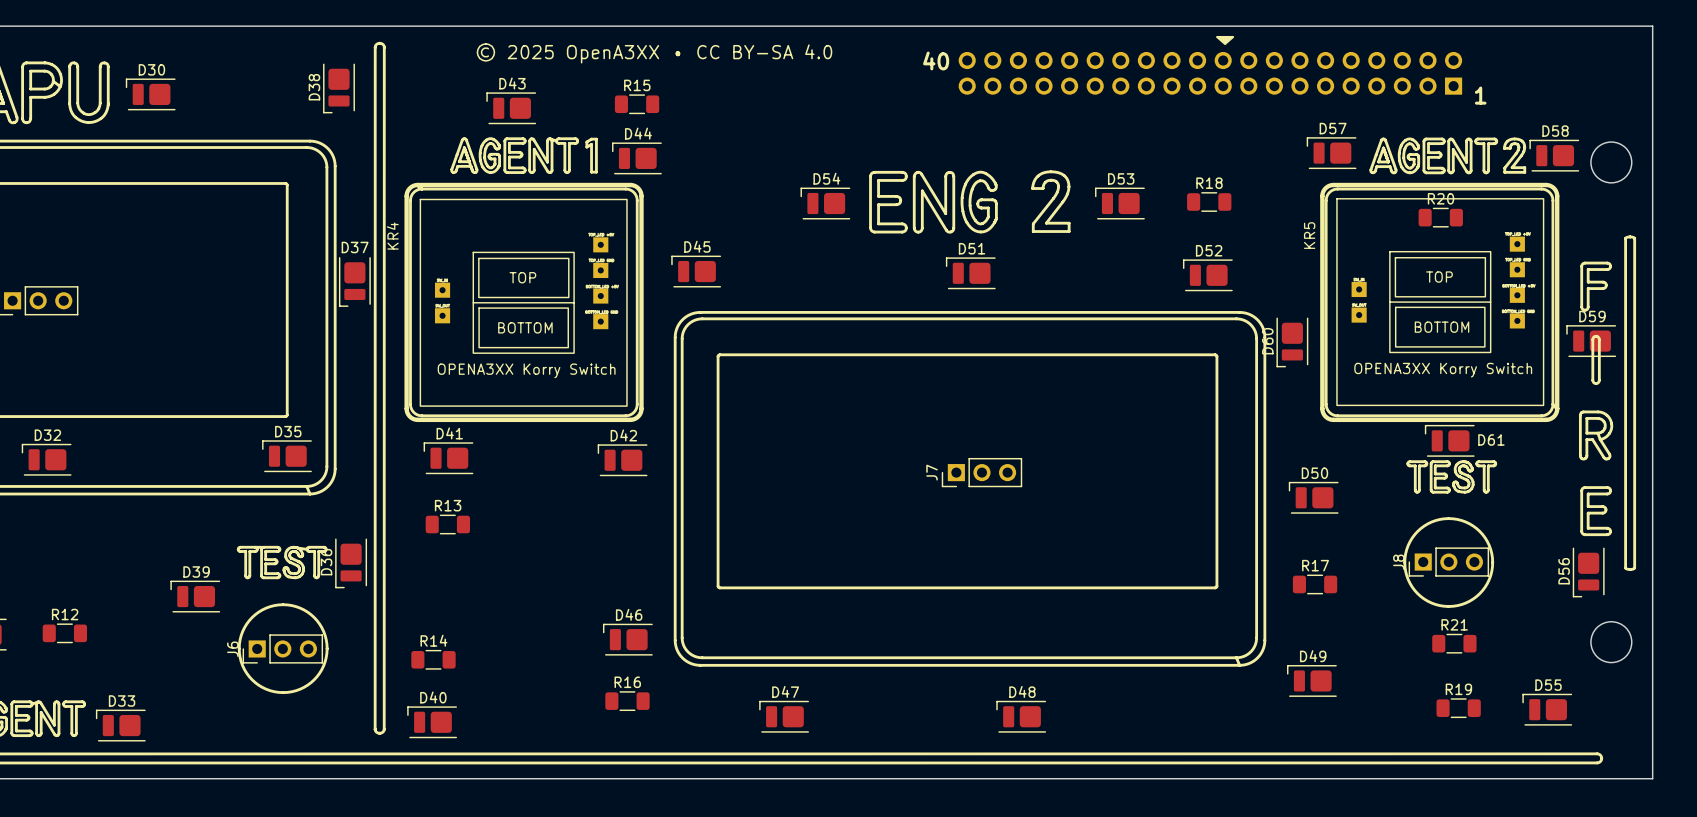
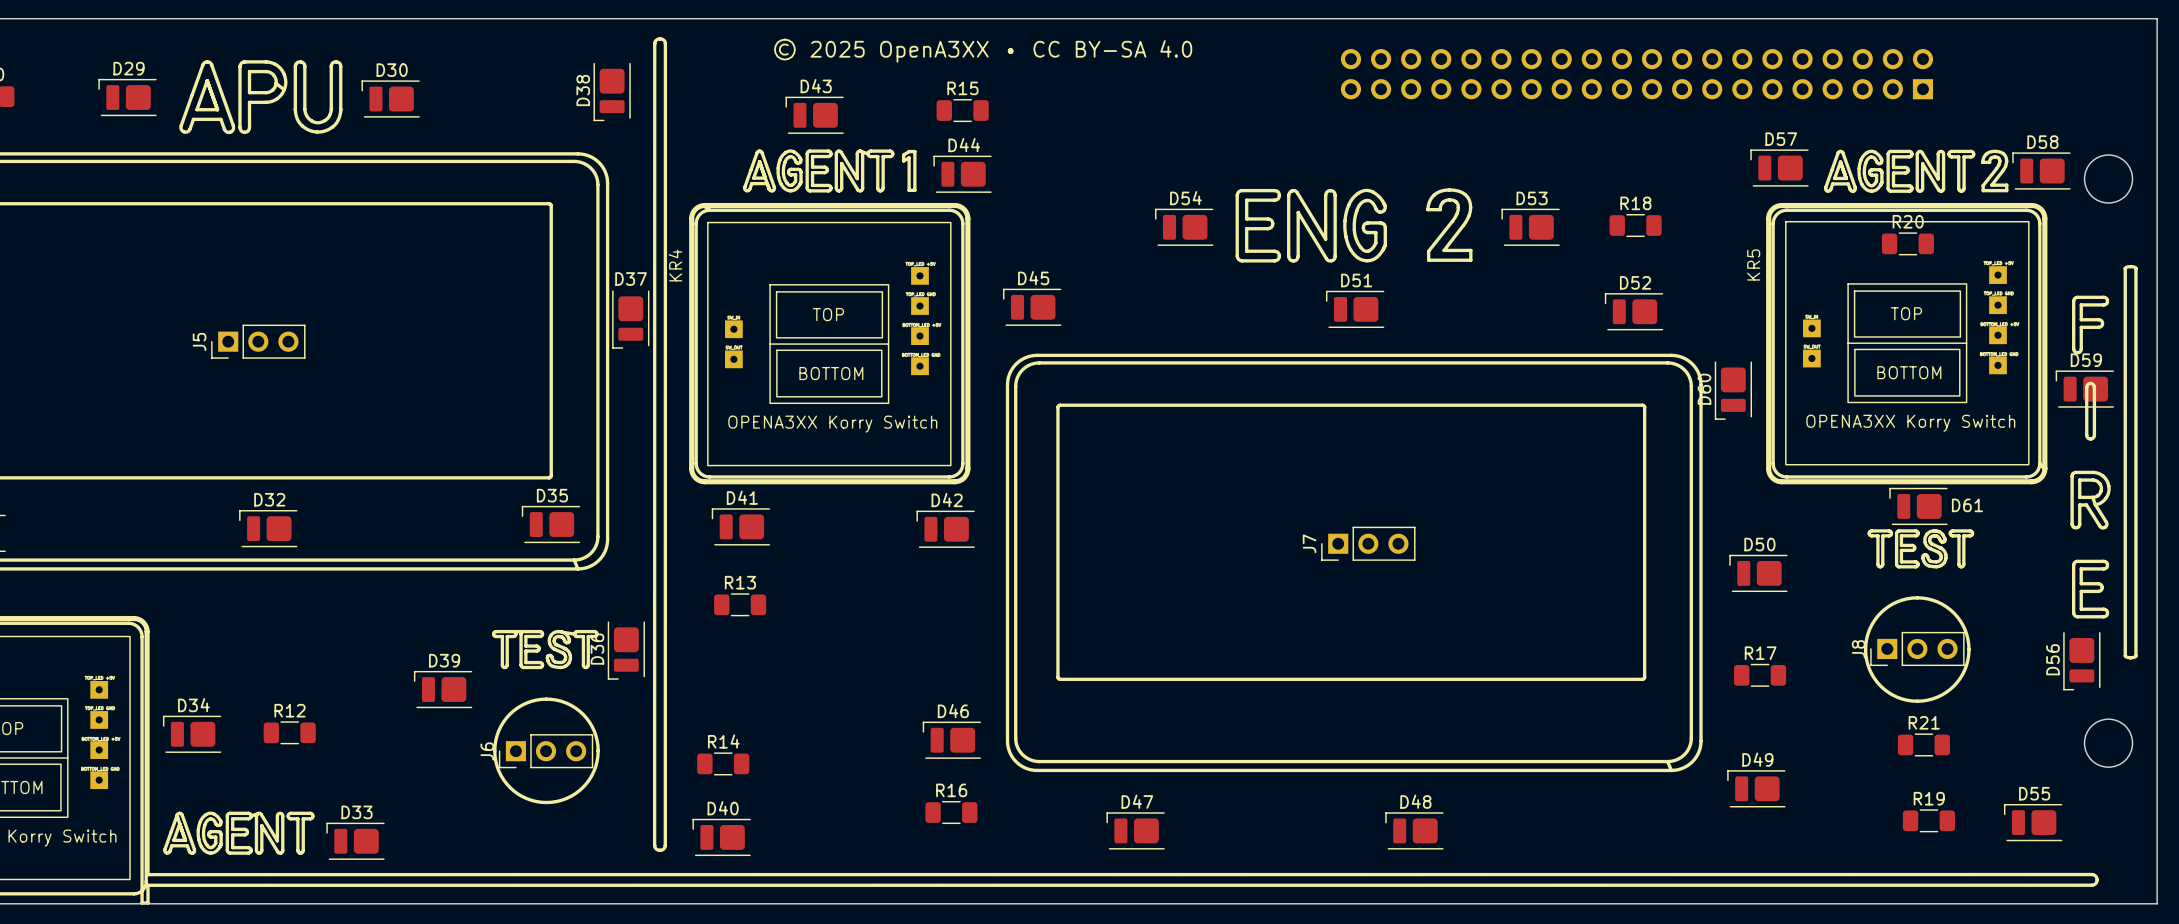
drawing: [1216, 35, 1235, 46] -> none
text: 40 (936, 60) -> none
text: 1 (1480, 95) -> none

